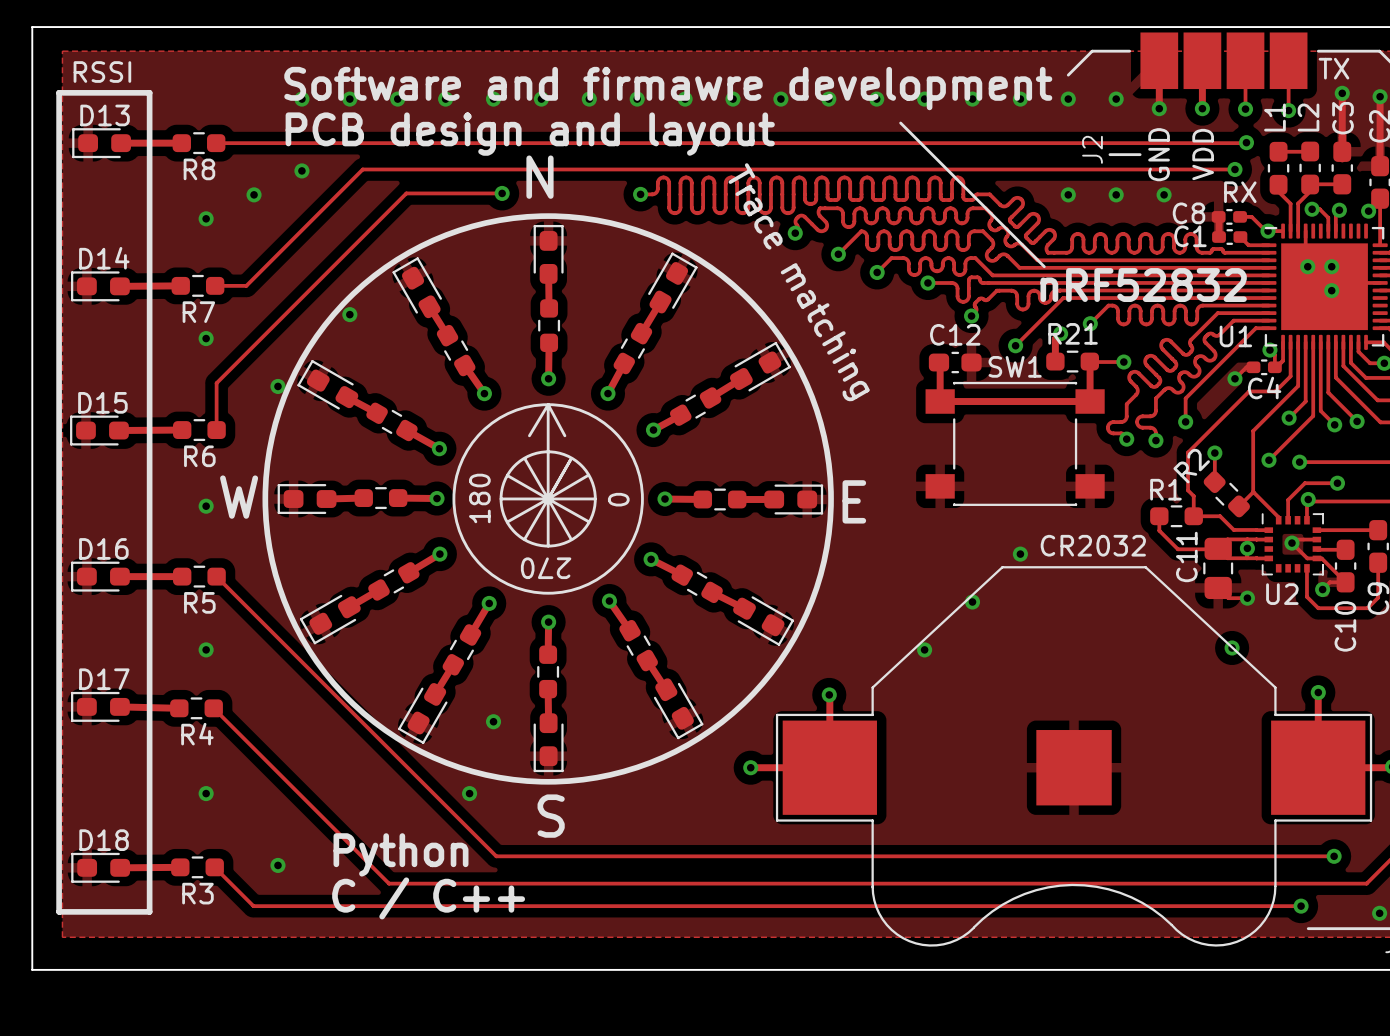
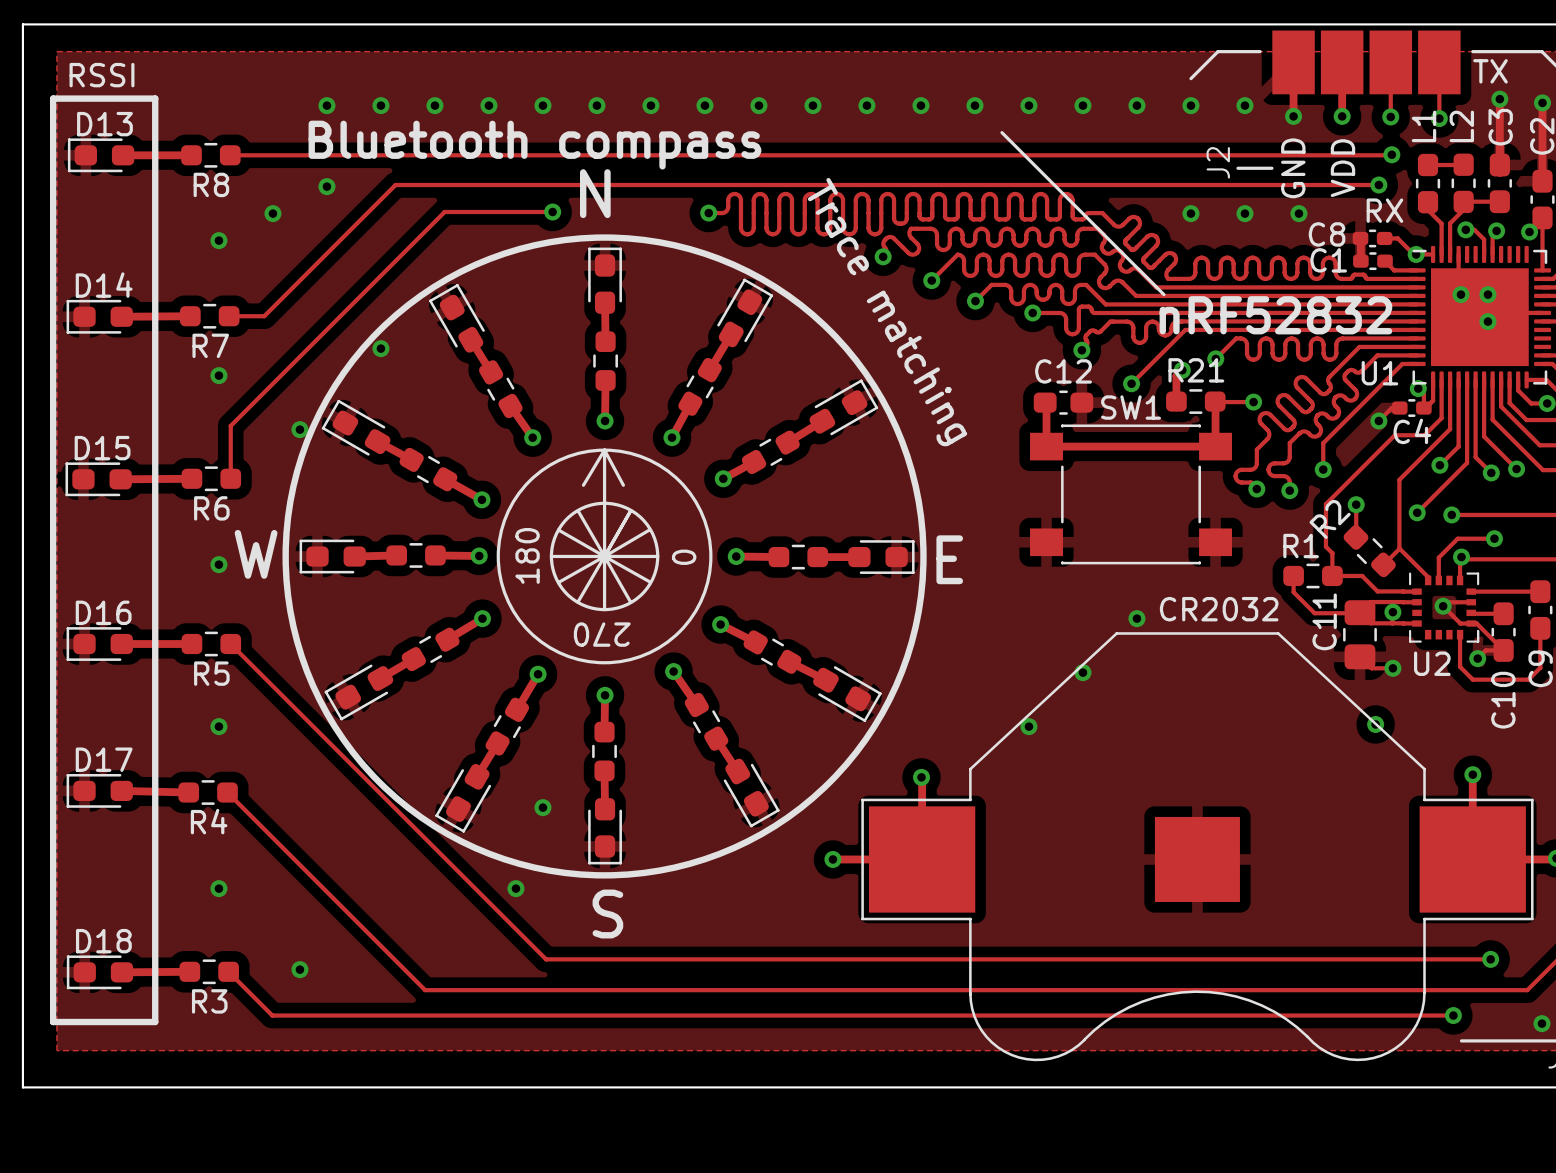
text: Software and firmawre development (668, 88) -> none
text: PCB design and layout (530, 134) -> Bluetooth compass (534, 145)
text: Python (400, 854) -> none
text: C / C++ (428, 898) -> none

